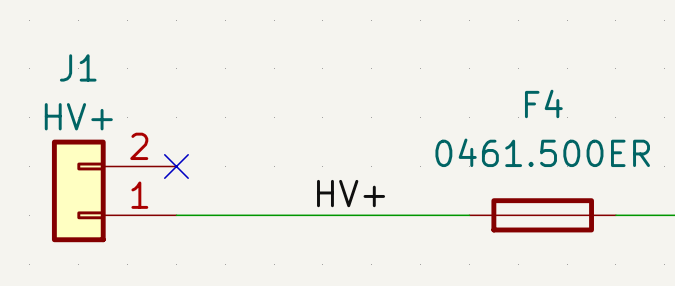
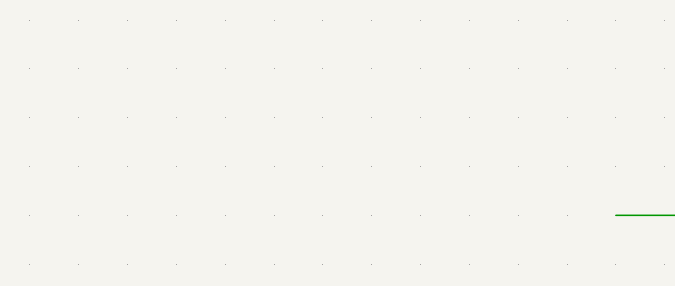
no-connect mark: (176, 166) -> none
J1: HV+ (114, 190) -> none
label: HV+ (351, 193) -> none
wire: (176, 215) (469, 215) -> none
F4: 0461.500ER (542, 215) -> none

